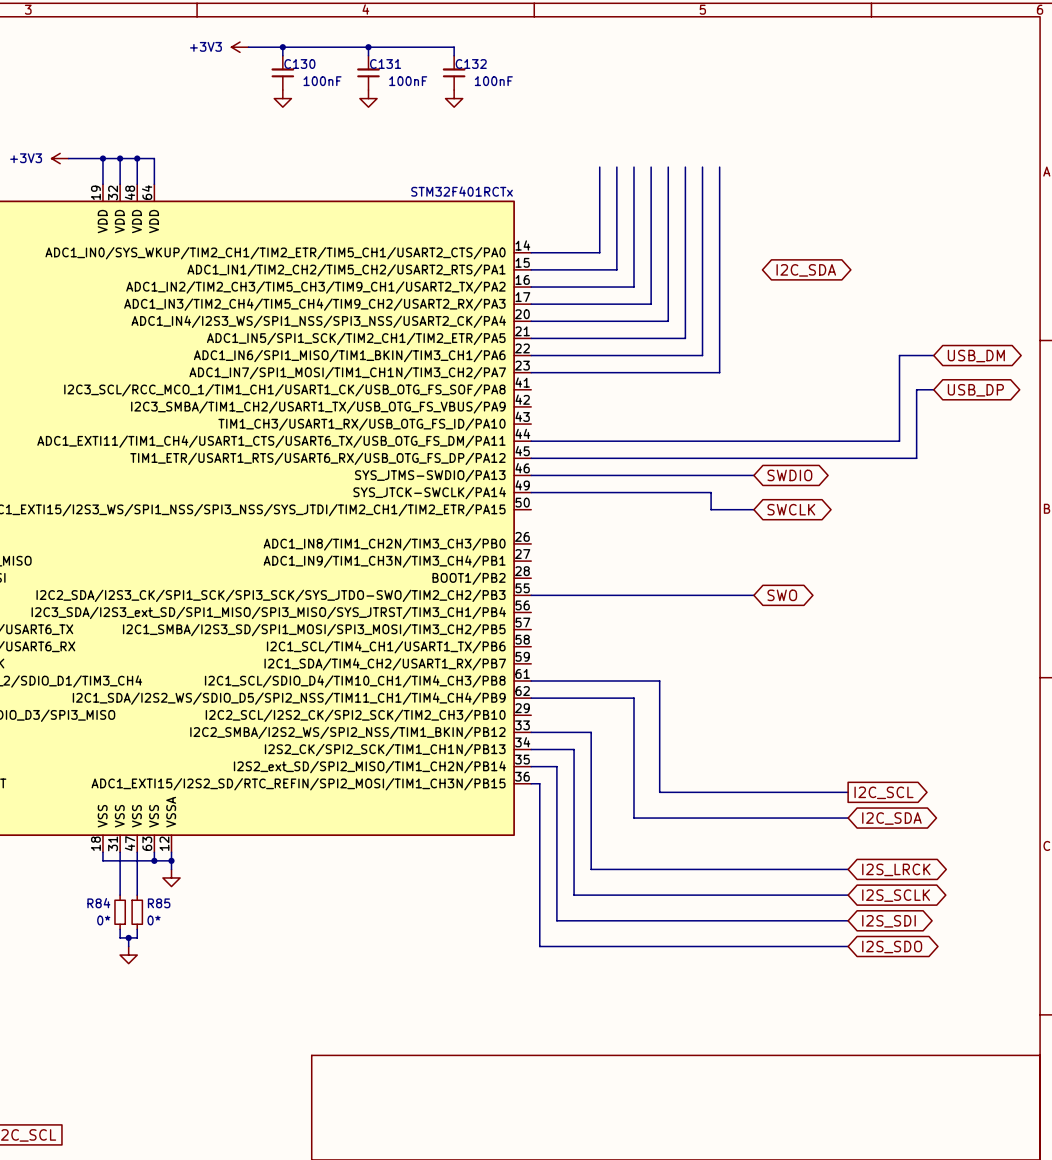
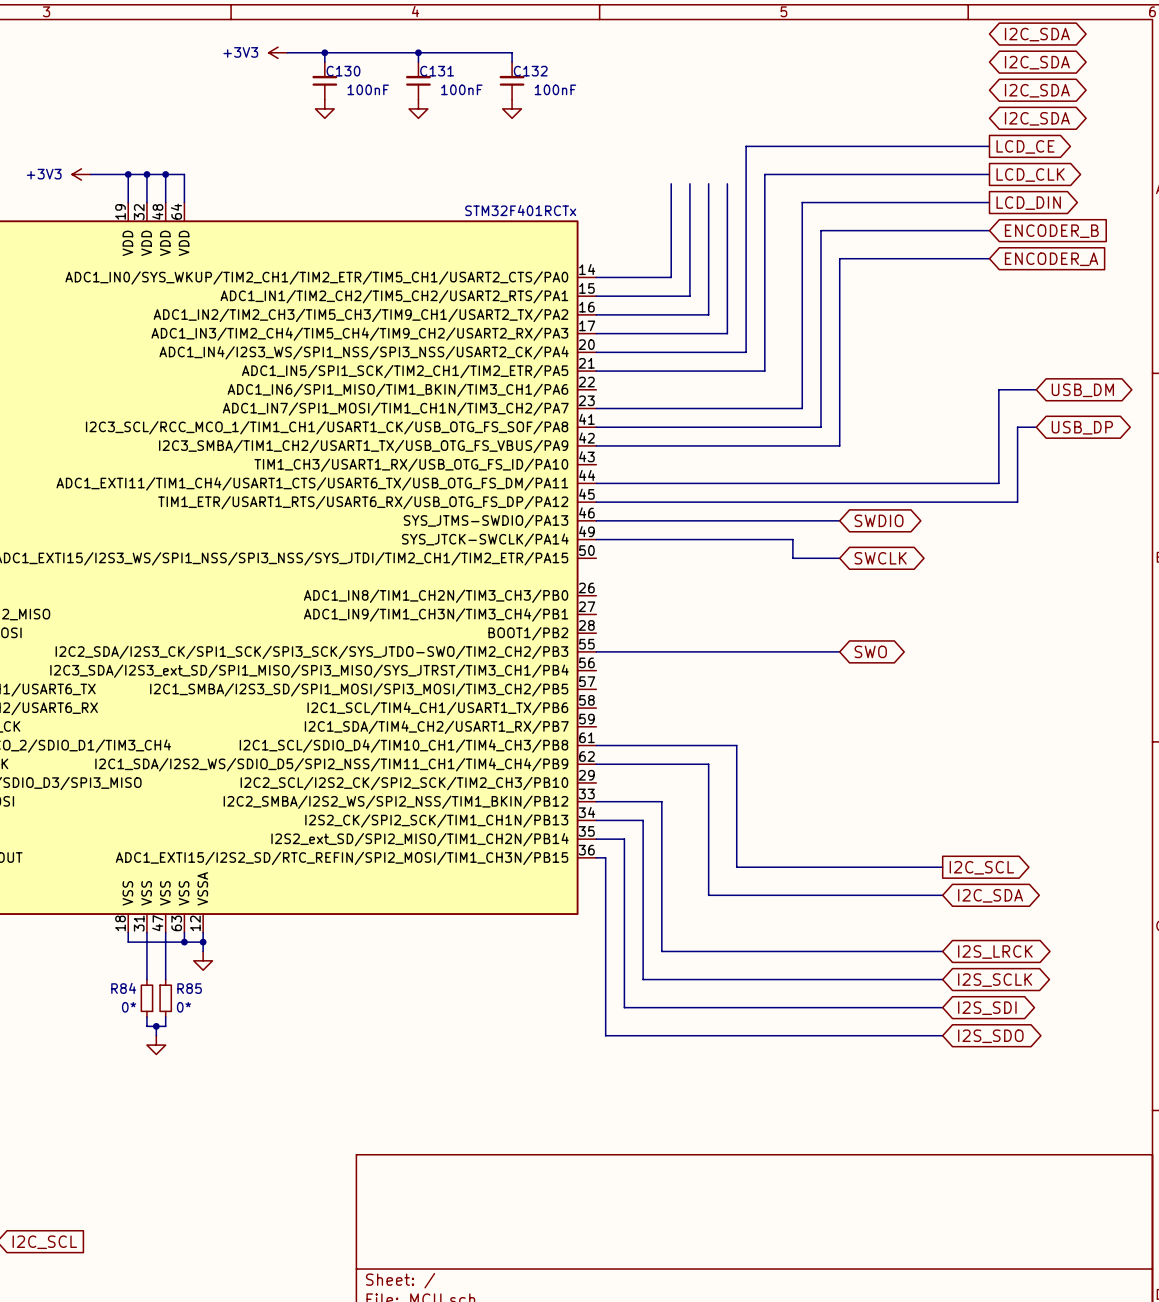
global label: none -> I2C_SDA (1037, 34)
global label: none -> I2C_SDA (1037, 62)
global label: none -> I2C_SDA (1037, 90)
global label: none -> I2C_SDA (1037, 118)
wire: none -> (989, 146) (746, 146) (746, 183)
global label: none -> LCD_CE (1025, 146)
wire: none -> (989, 174) (764, 174) (764, 183)
global label: none -> LCD_CLK (1030, 175)
wire: (702, 167) (702, 355) (531, 355) -> none
wire: (719, 167) (719, 184) -> (989, 202) (802, 202)
global label: none -> LCD_DIN (1028, 203)
wire: none -> (989, 230) (820, 230) (820, 427) (596, 427)
global label: none -> ENCODER_B (1051, 231)
wire: none -> (989, 258) (839, 258) (839, 445) (596, 445)
global label: none -> ENCODER_A (1051, 259)
global label: I2C_SDA (806, 270) -> none

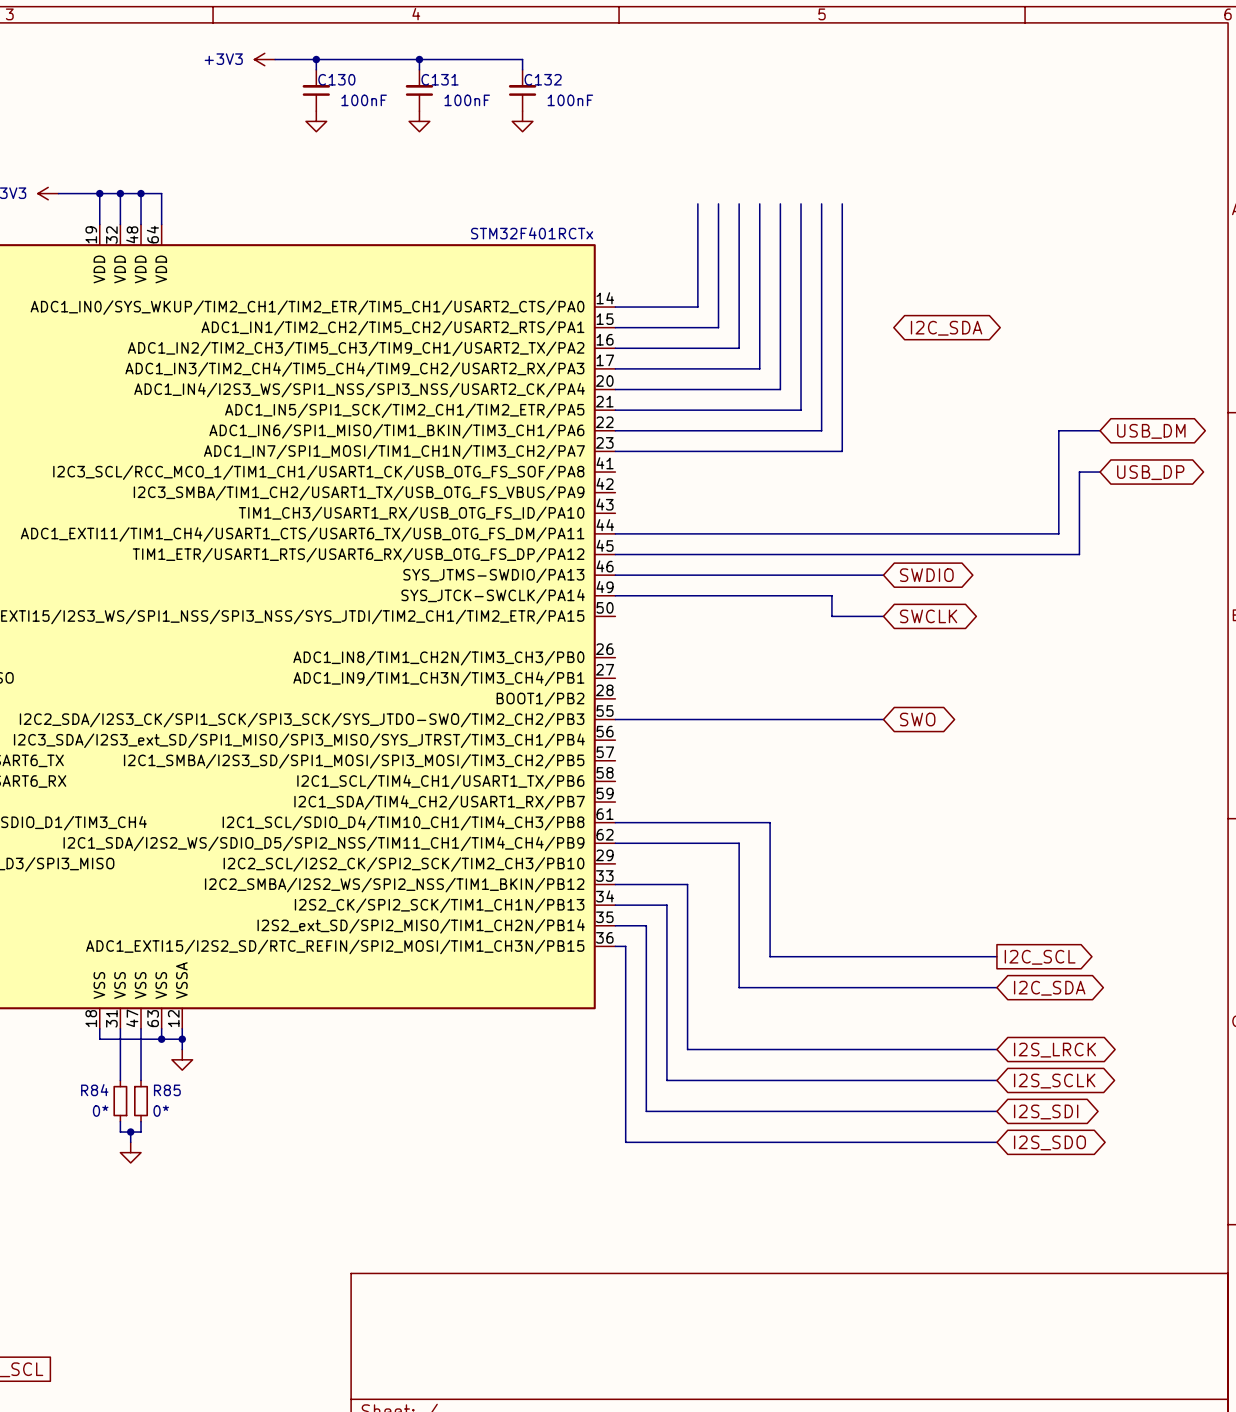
global label: I2C_SDA (1037, 34) -> none
global label: I2C_SDA (1037, 62) -> none
global label: I2C_SDA (1037, 90) -> none
global label: I2C_SDA (1037, 118) -> none
wire: (989, 146) (746, 146) (746, 183) -> none
global label: LCD_CE (1025, 146) -> none
wire: (989, 174) (764, 174) (764, 183) -> none
global label: LCD_CLK (1030, 175) -> none
wire: none -> (821, 203) (821, 430) (615, 430)
wire: (802, 202) (989, 202) -> (842, 224) (842, 203)
global label: LCD_DIN (1028, 203) -> none
wire: (989, 230) (820, 230) (820, 427) (596, 427) -> none
global label: ENCODER_B (1051, 231) -> none
wire: (989, 258) (839, 258) (839, 445) (596, 445) -> none
global label: ENCODER_A (1051, 259) -> none
global label: none -> I2C_SDA (946, 328)

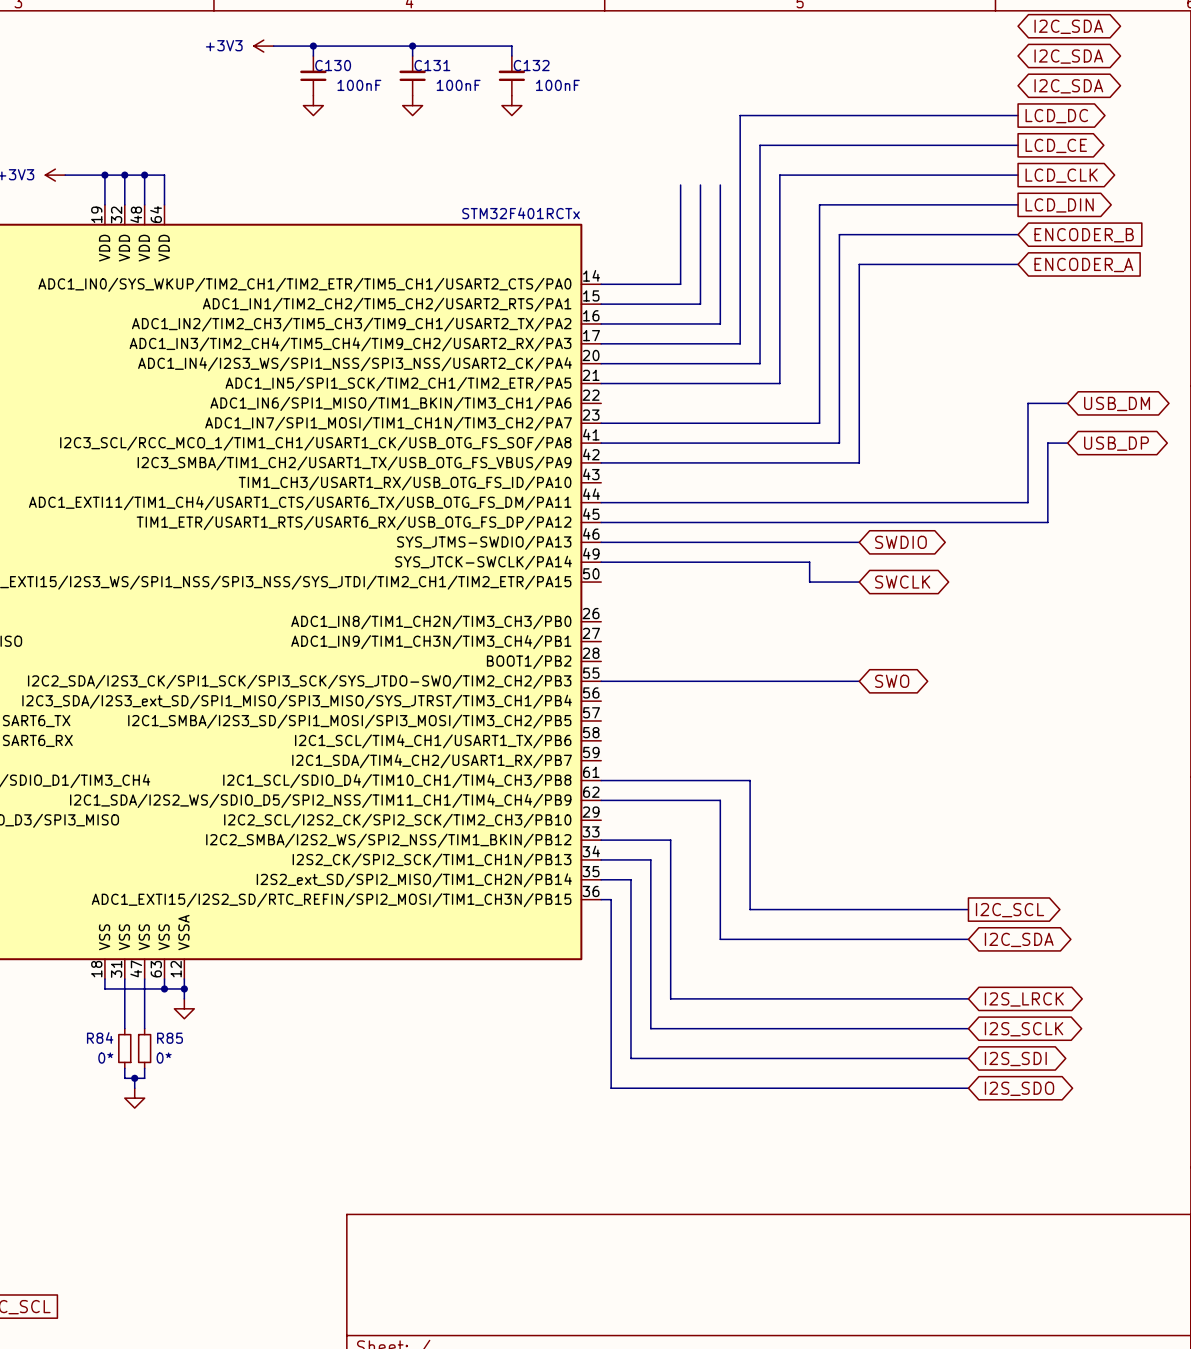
global label: none -> I2C_SDA (1068, 26)
global label: none -> I2C_SDA (1068, 56)
global label: none -> I2C_SDA (1068, 86)
wire: none -> (1018, 115) (740, 115) (740, 185)
global label: none -> LCD_DC (1056, 116)
wire: none -> (1018, 145) (760, 145) (760, 185)
global label: none -> LCD_CE (1056, 145)
wire: none -> (1018, 175) (779, 175) (779, 185)
global label: none -> LCD_CLK (1061, 175)
wire: (821, 203) (821, 430) (615, 430) -> none
wire: (842, 203) (842, 224) -> (1018, 204) (819, 204)
global label: none -> LCD_DIN (1059, 205)
wire: none -> (1018, 234) (839, 234) (839, 443) (601, 443)
global label: none -> ENCODER_B (1084, 235)
wire: none -> (1018, 264) (859, 264) (859, 462) (601, 462)
global label: none -> ENCODER_A (1083, 264)
global label: I2C_SDA (946, 328) -> none

